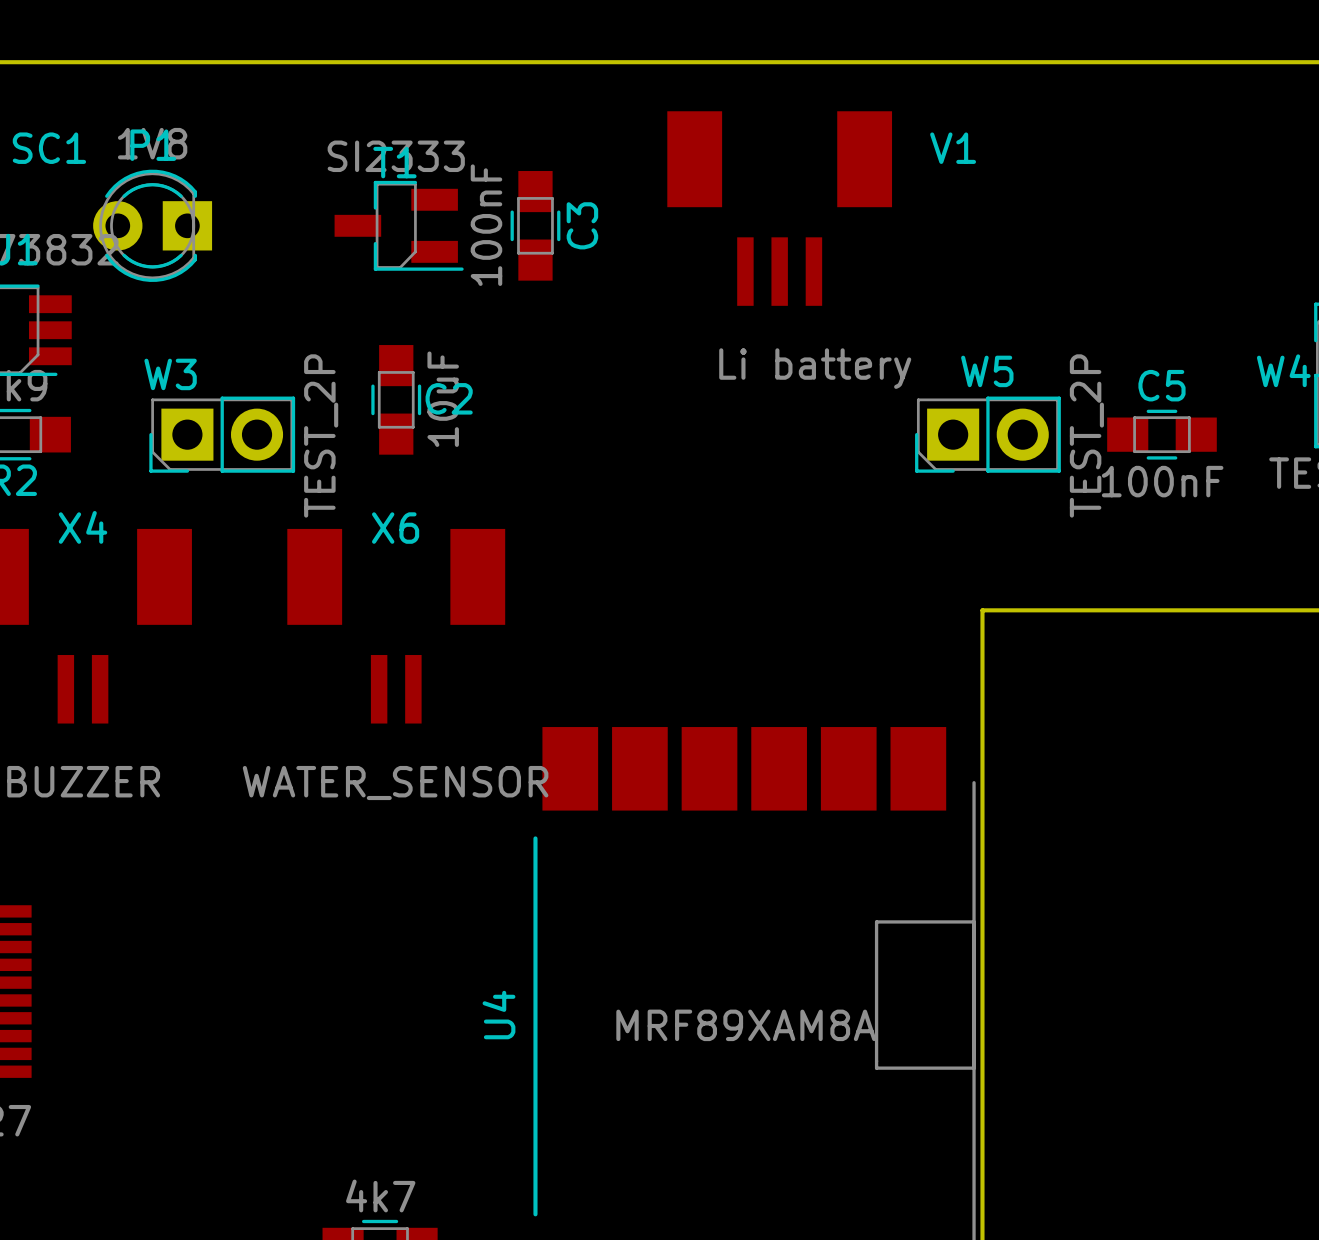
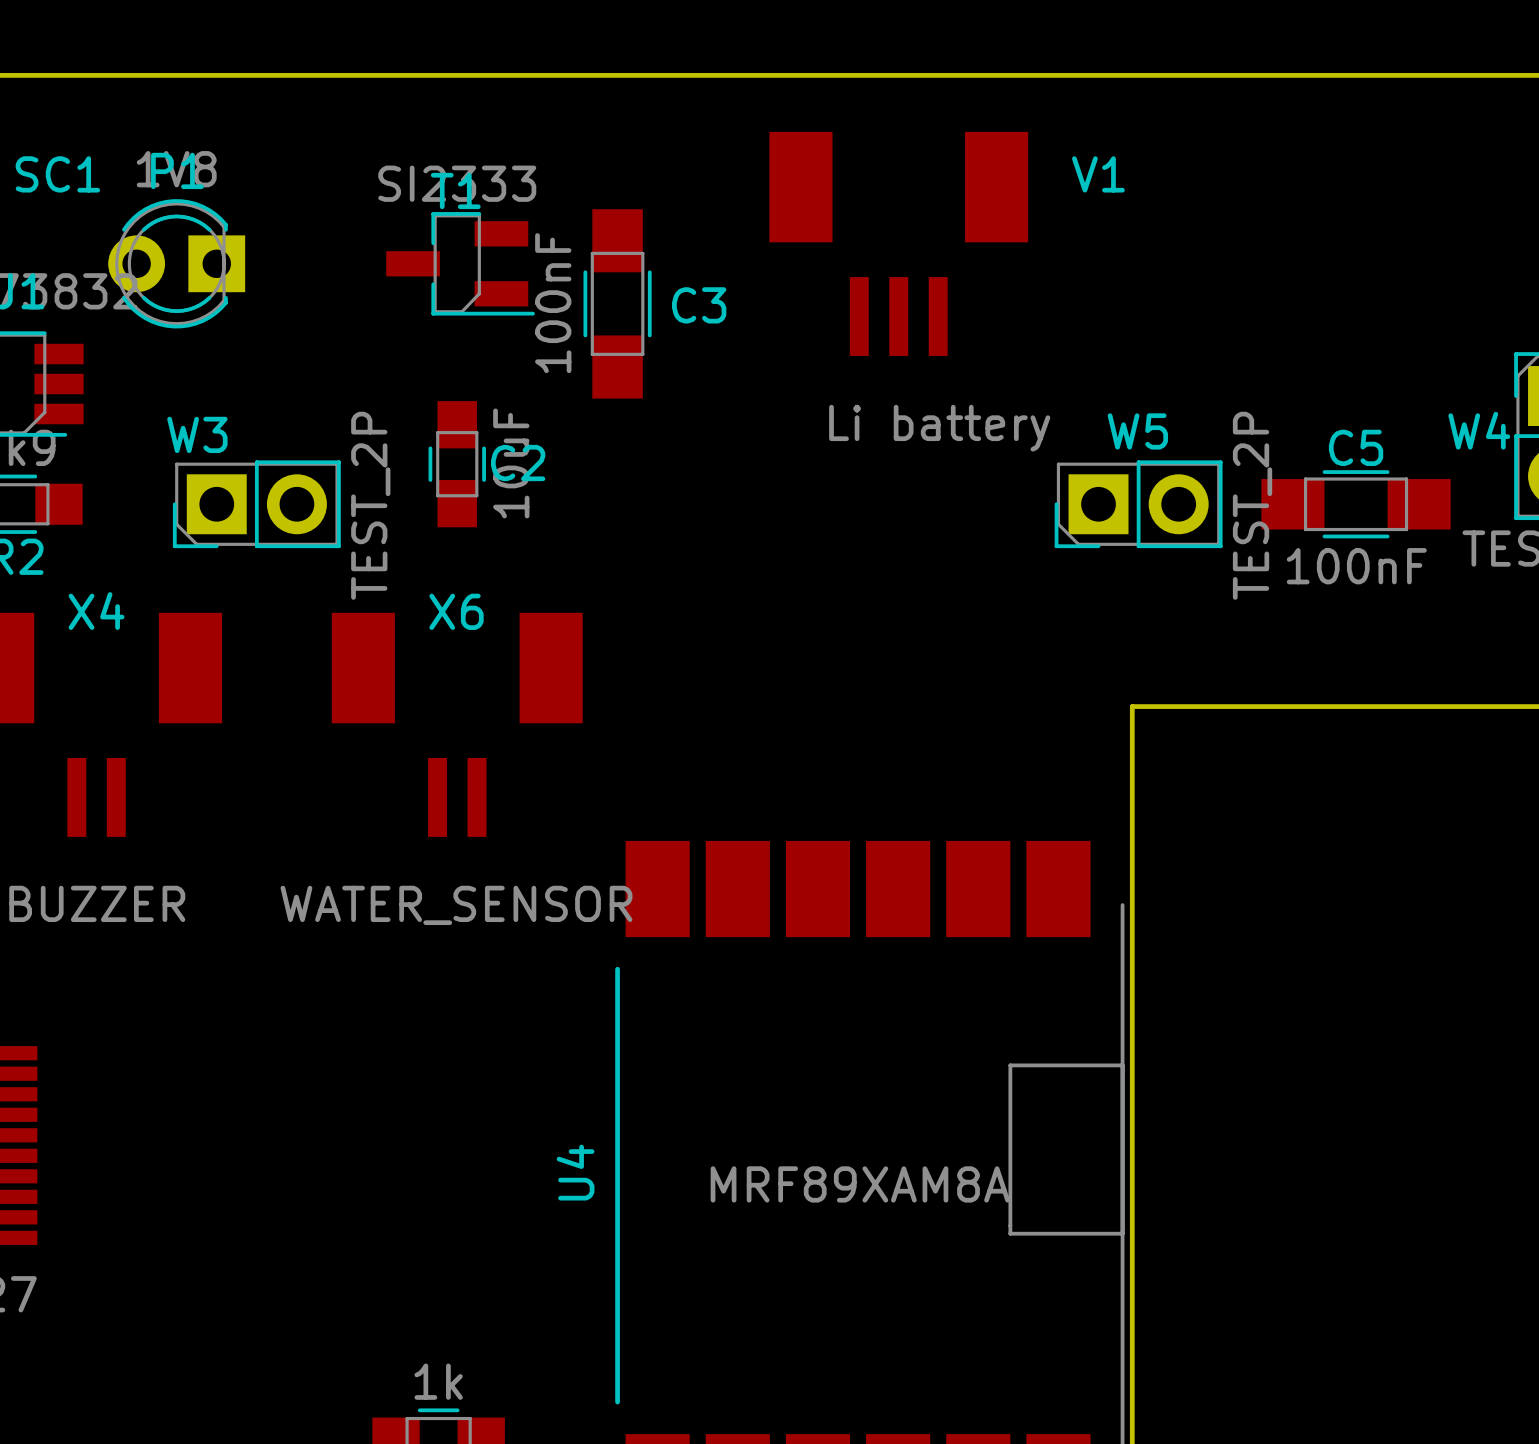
C3 footprint: [510, 171, 561, 281] -> [583, 209, 652, 399]
C5 footprint: [1107, 409, 1217, 460] -> [1261, 470, 1451, 539]
part value: 4k7 (380, 1195) -> 1k (438, 1381)

